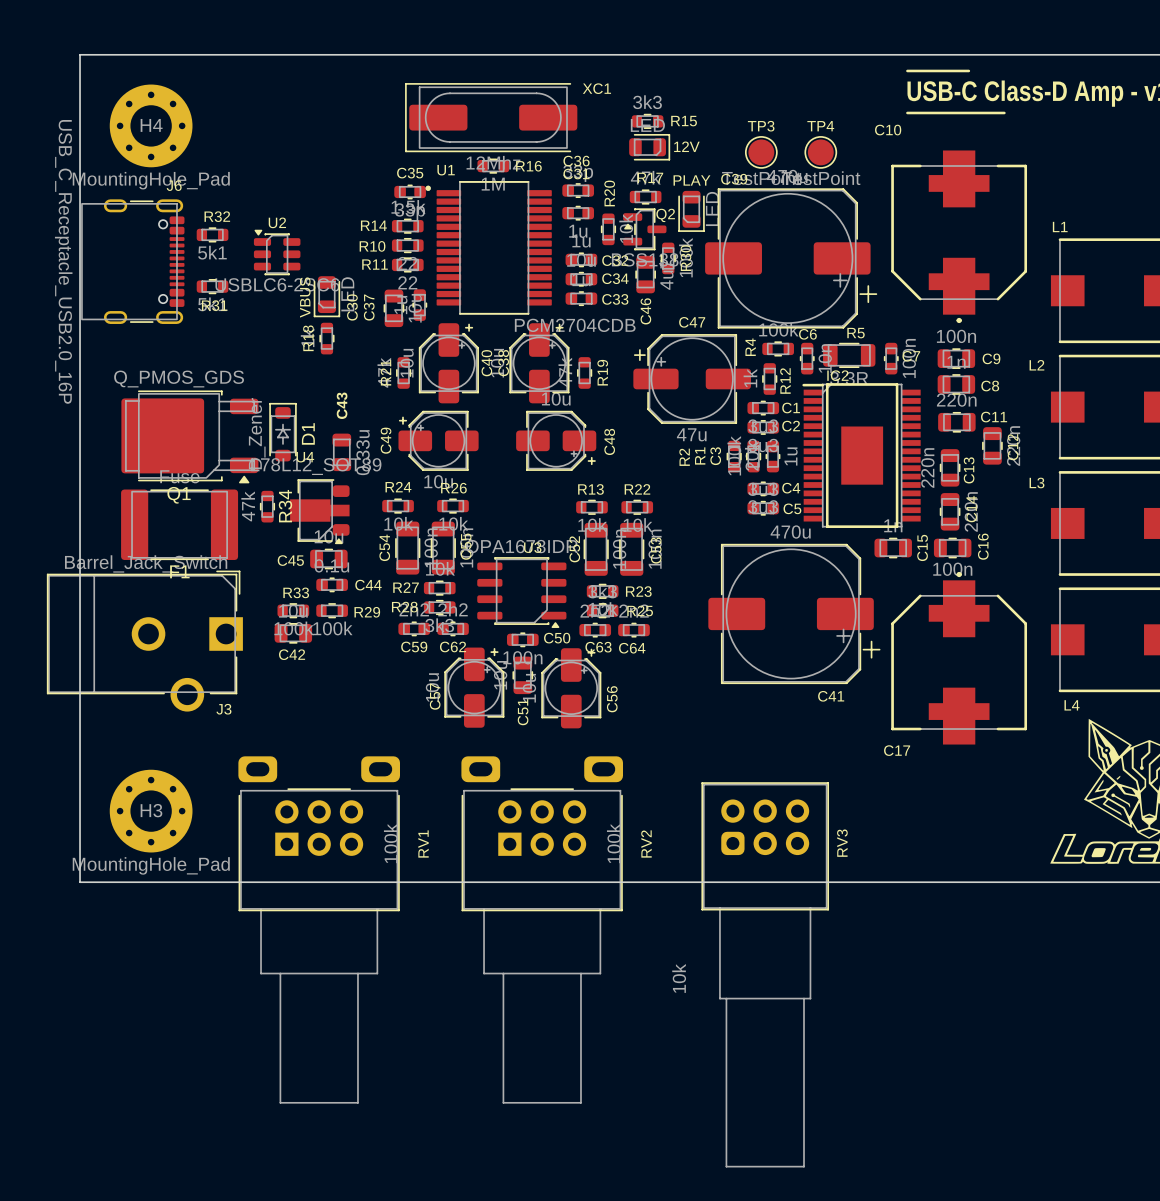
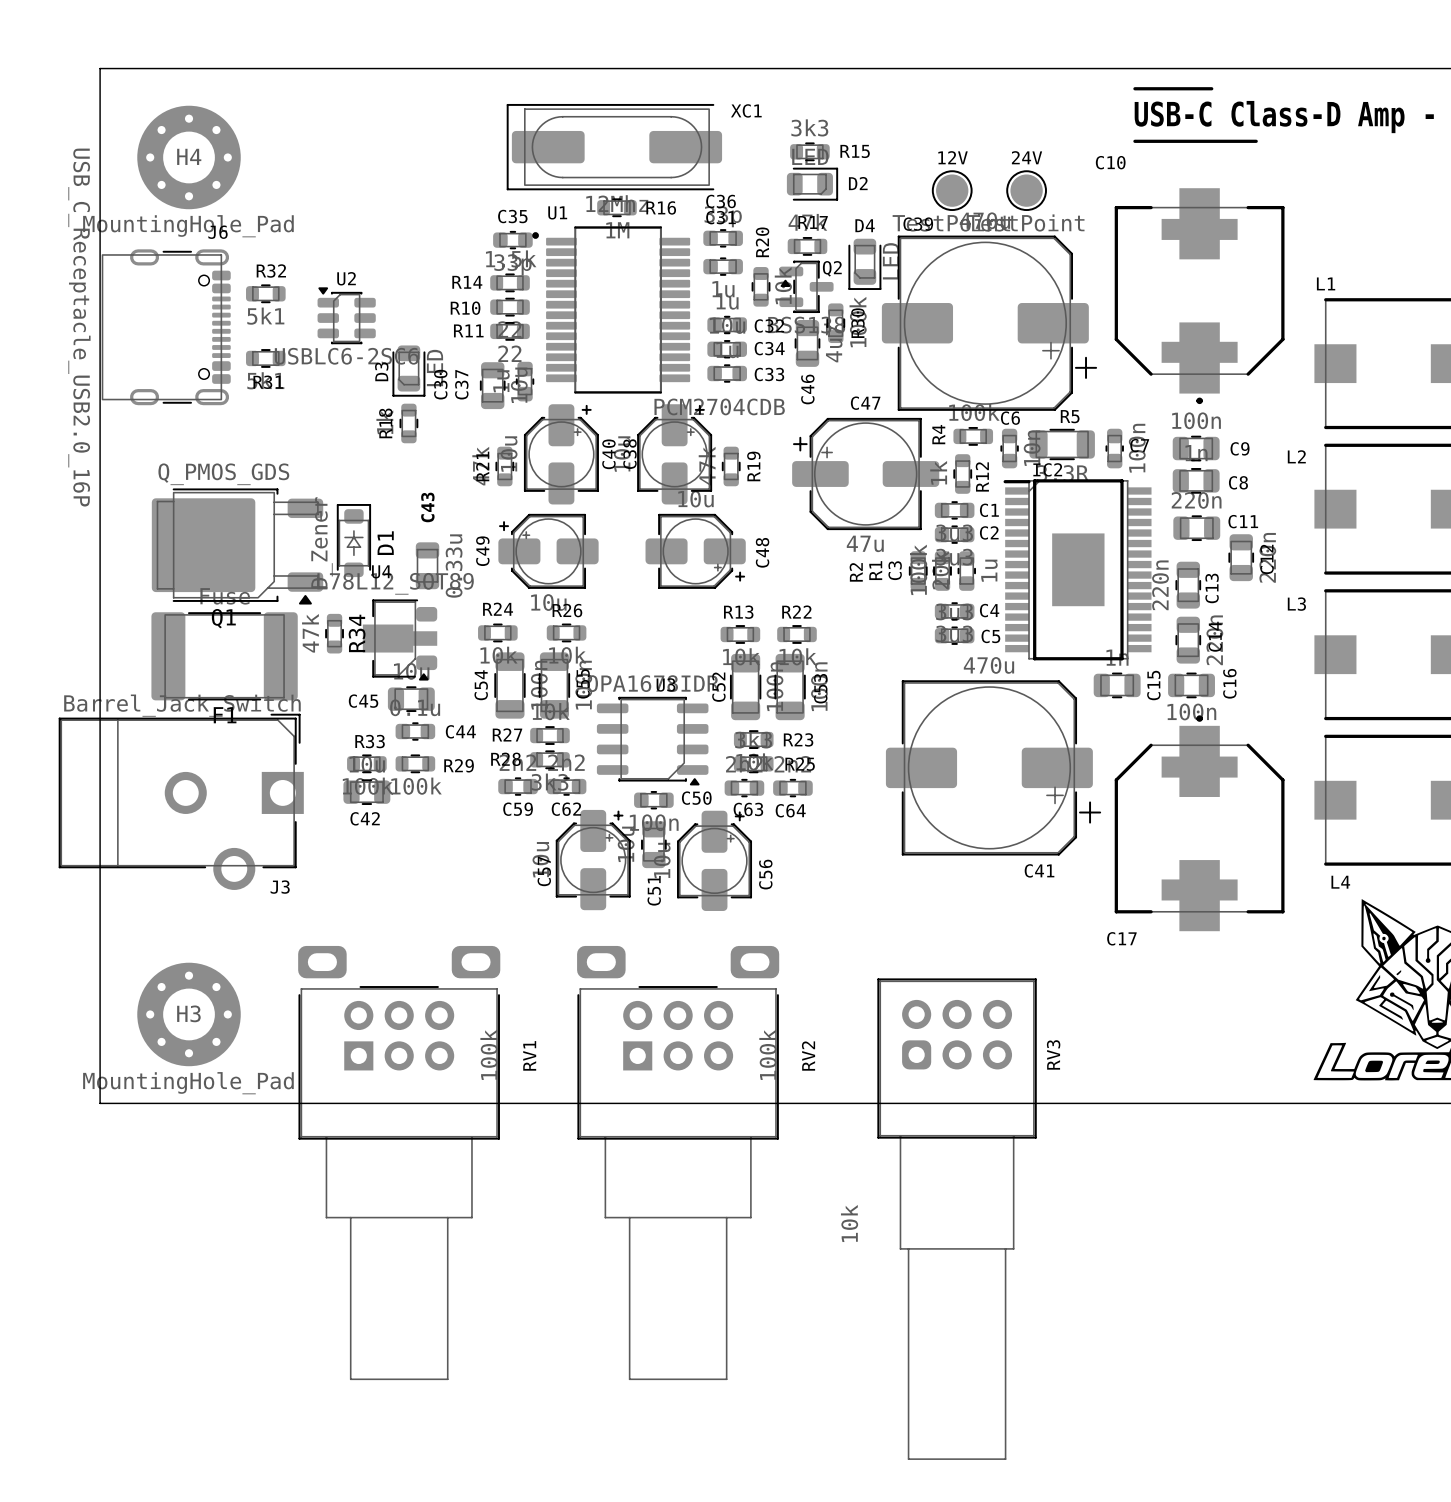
TP3 name: TP3 (761, 126) -> 12V (953, 157)
TP4 name: TP4 (820, 126) -> 24V (1027, 157)
12V name: 12V (686, 146) -> D2 (858, 183)
PLAY name: PLAY (691, 180) -> D4 (865, 225)
VBUS name: VBUS (305, 297) -> D3 (381, 371)

